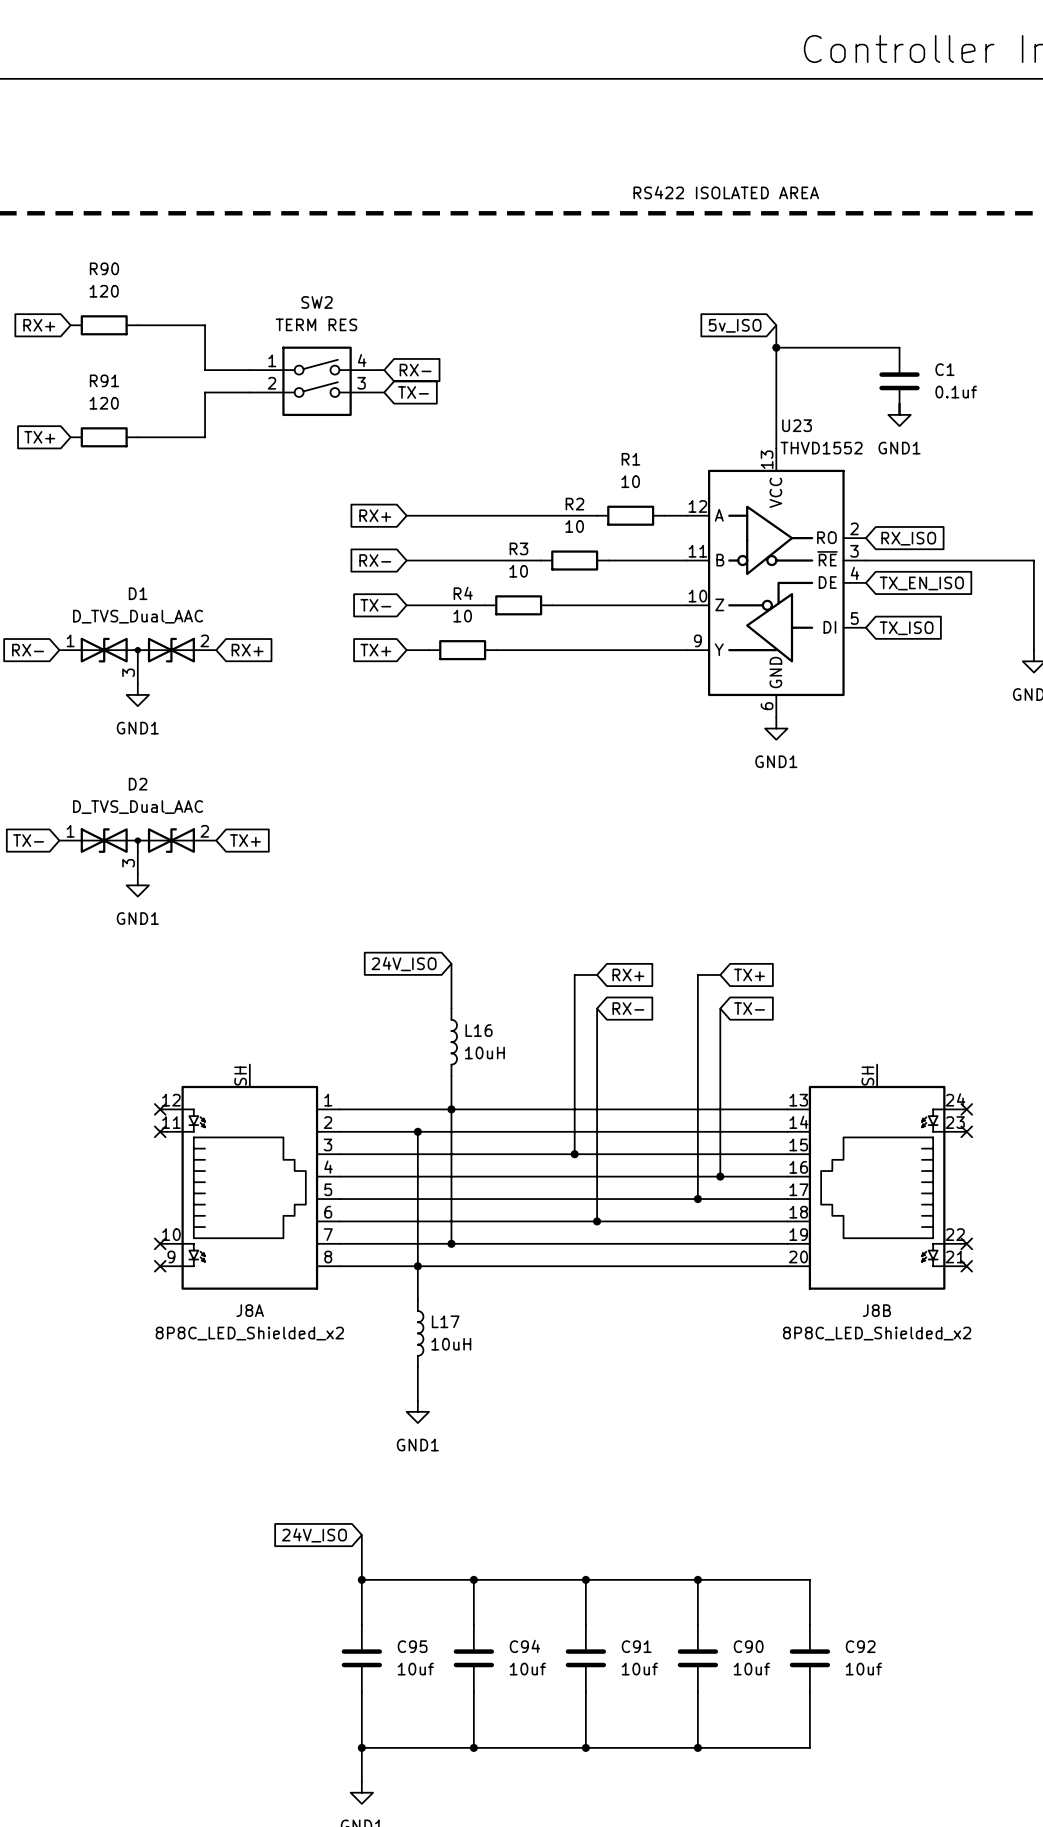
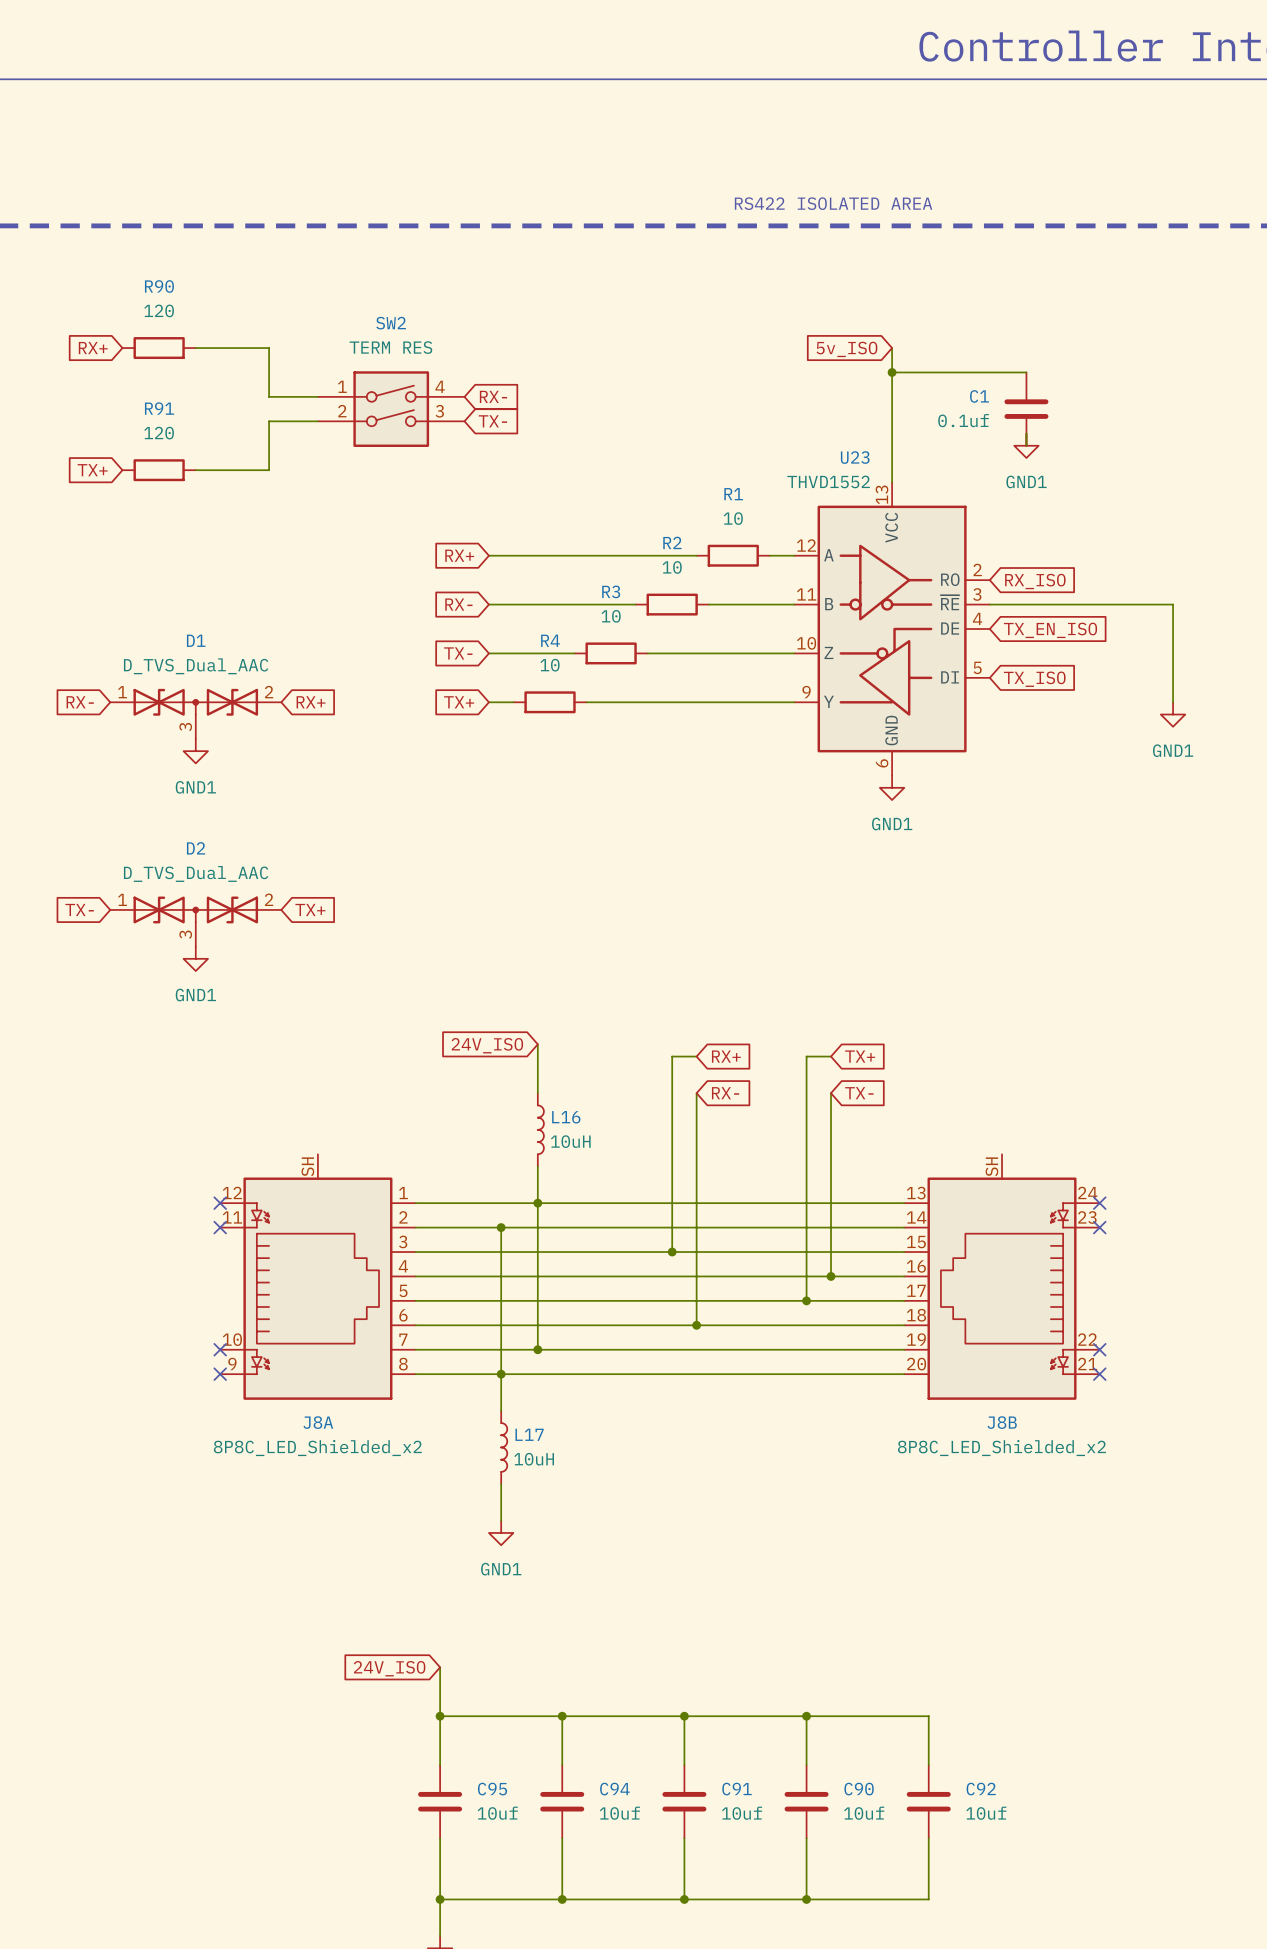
C1 name position: C1 (944, 369) -> C1 (979, 396)
C1 value position: 0.1uf (956, 392) -> 0.1uf (963, 420)
U23 name position: U23 (797, 425) -> U23 (855, 457)
U23 value position: THVD1552 (821, 448) -> THVD1552 (828, 481)

